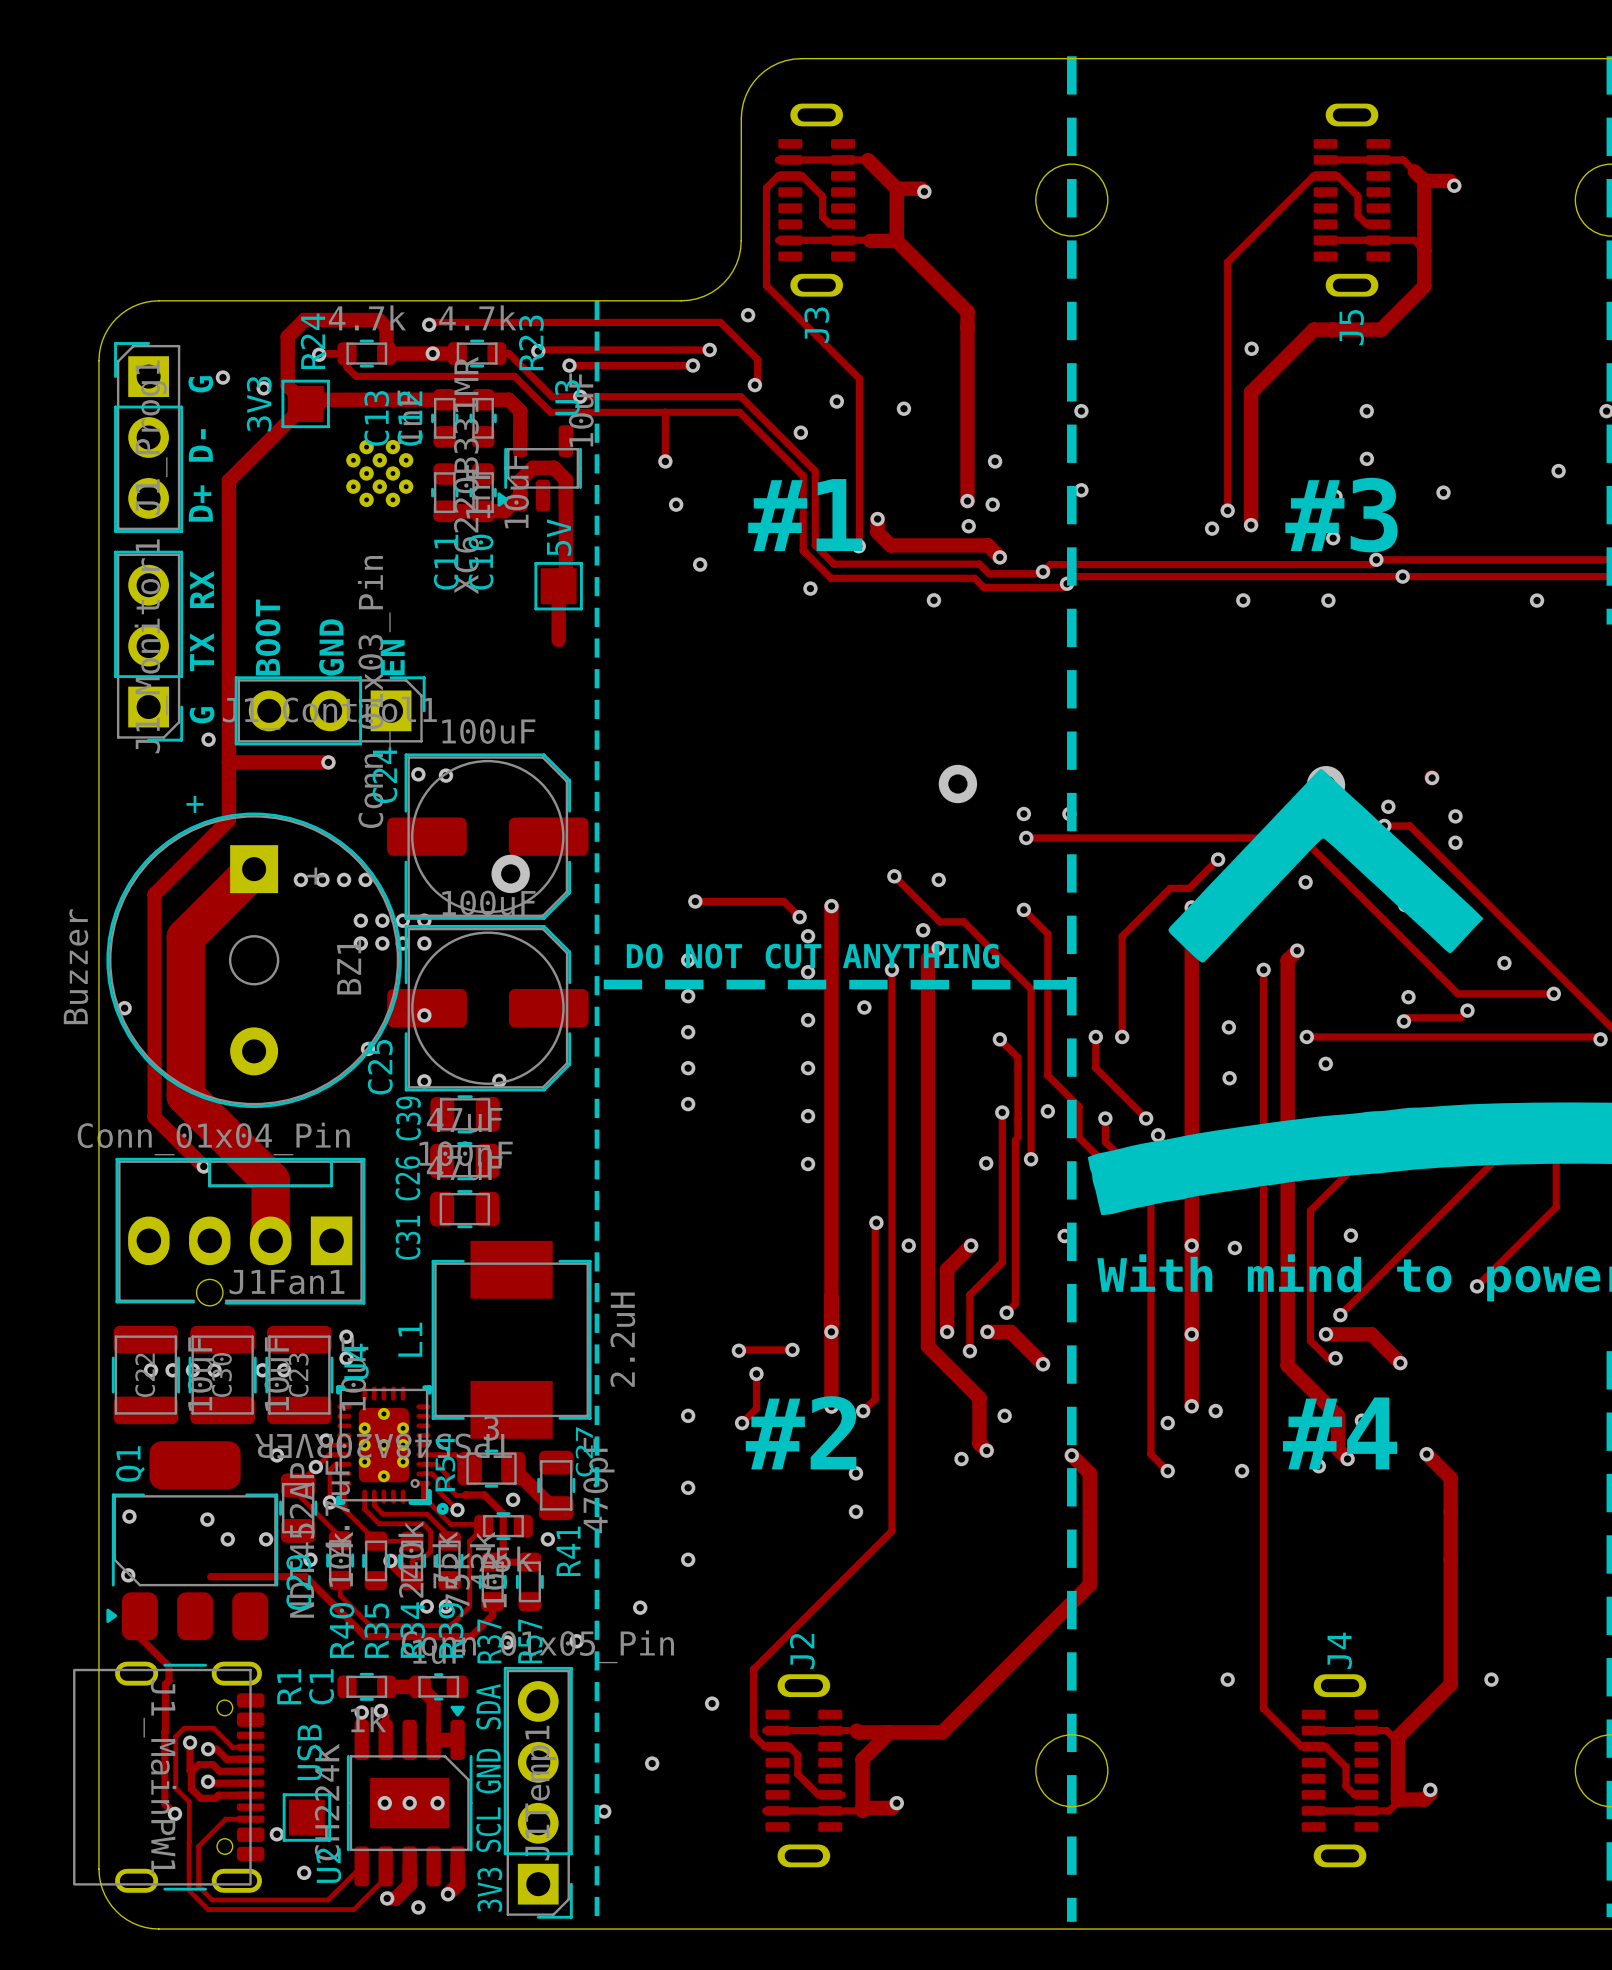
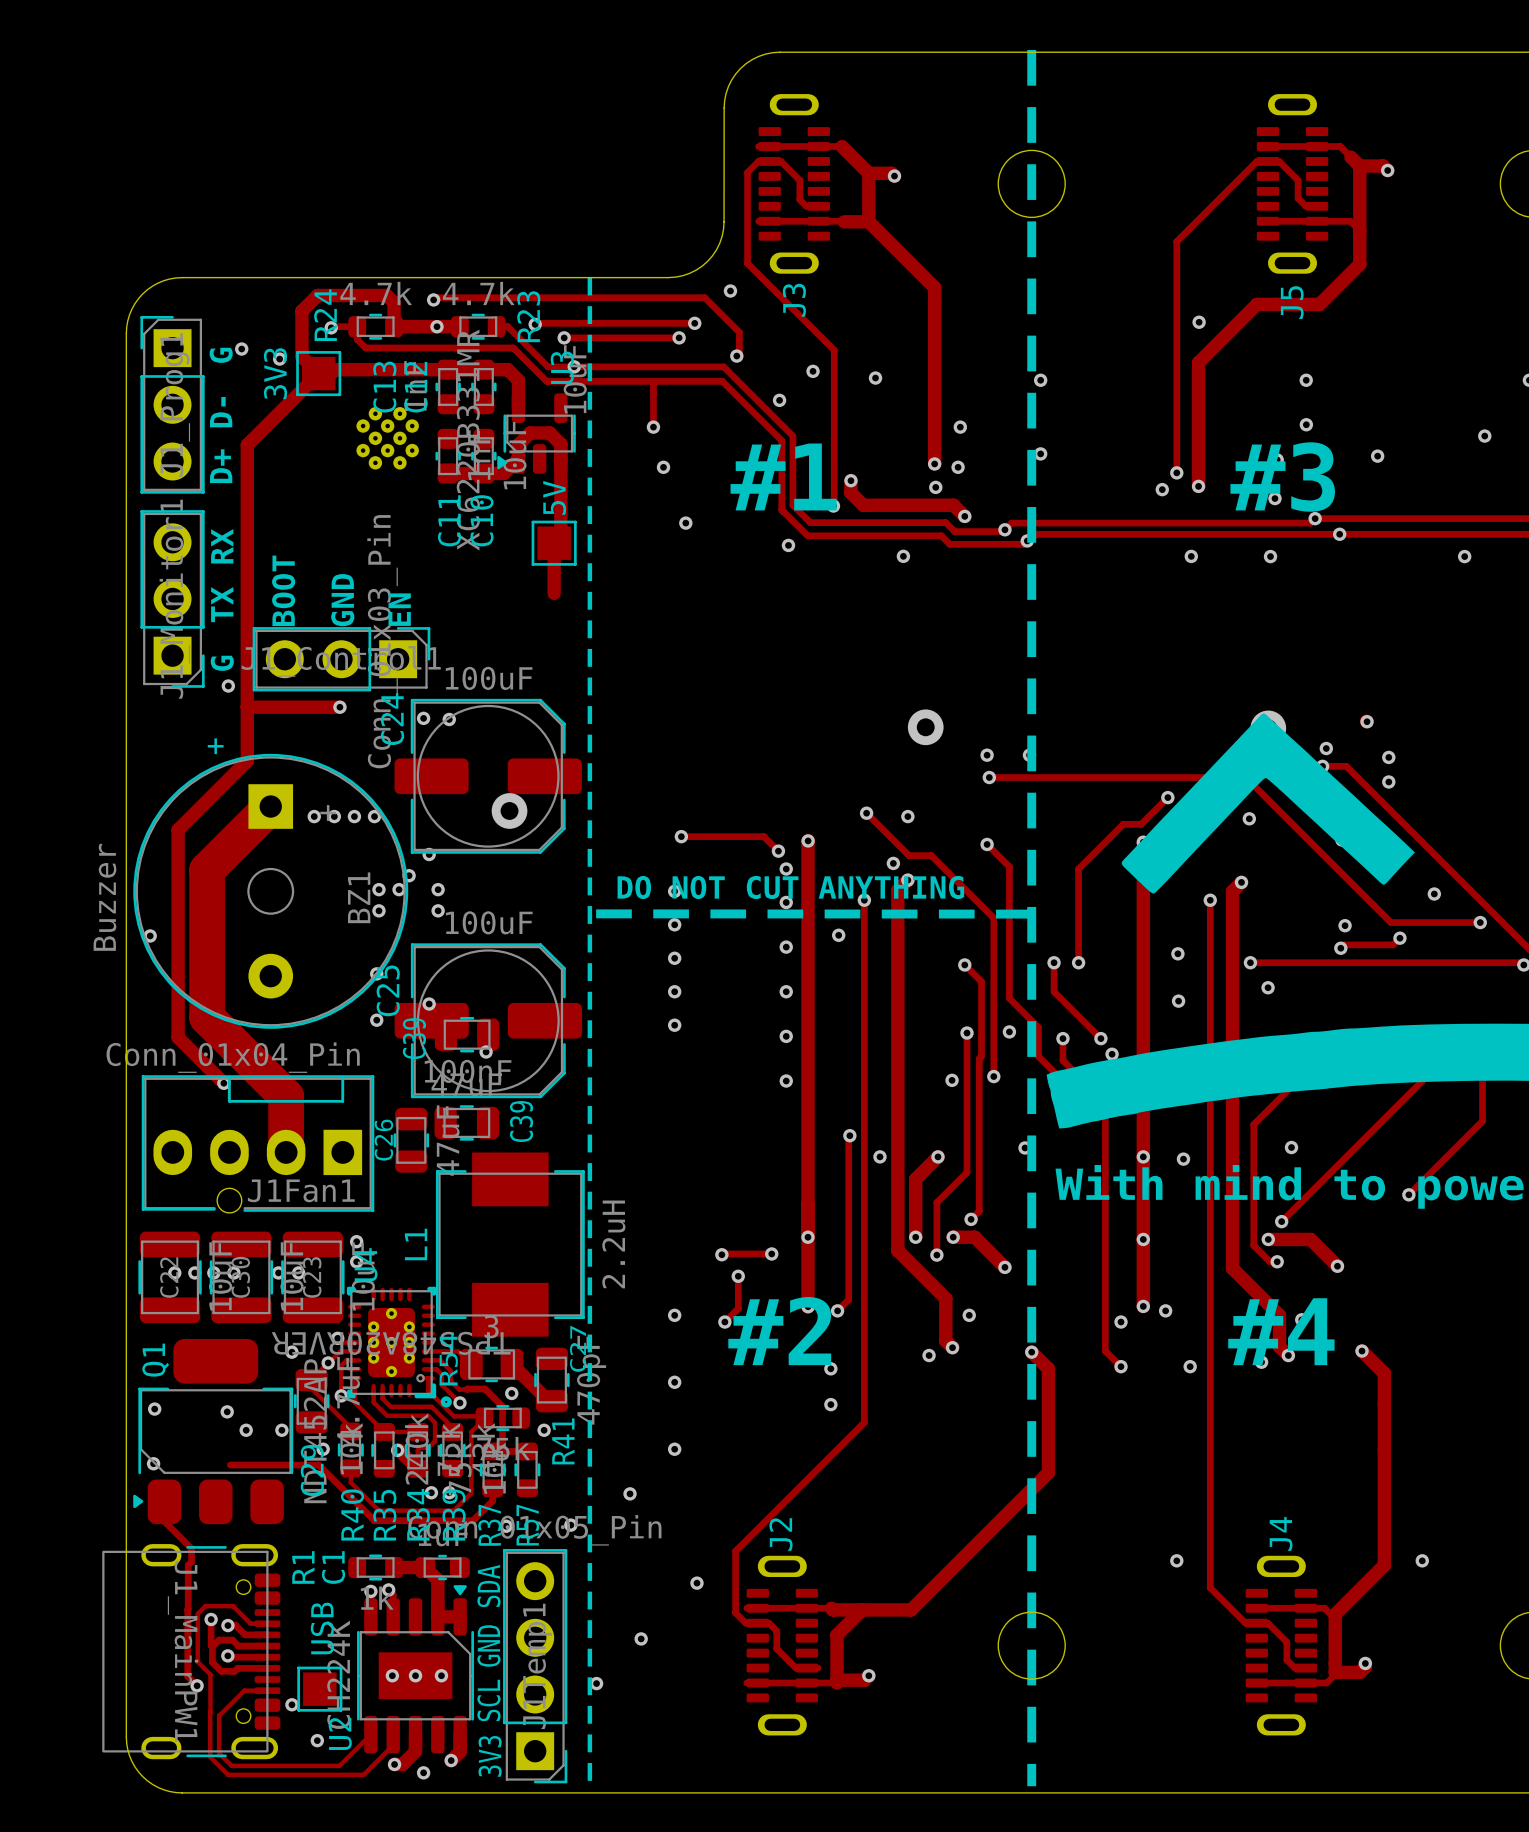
via: (360, 920) -> none
via: (382, 920) -> none
via: (402, 920) -> none
via: (360, 943) -> none
via: (382, 943) -> none
via: (424, 943) -> none
via: none -> (378, 889)
via: none -> (399, 889)
via: none -> (438, 889)
via: none -> (378, 910)
via: none -> (438, 910)
C25 position: (487, 1008) -> (488, 1020)
via: (424, 1015) -> none
via position: (499, 1080) -> (486, 1052)
via: none -> (376, 1020)
C26 rotation: 0° (464, 1161) -> 90° clockwise (411, 1140)
C26 position: (464, 1161) -> (411, 1140)
C31 name: C31 (408, 1237) -> C39 (521, 1121)

